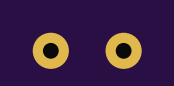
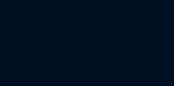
part: (87, 50) -> none

